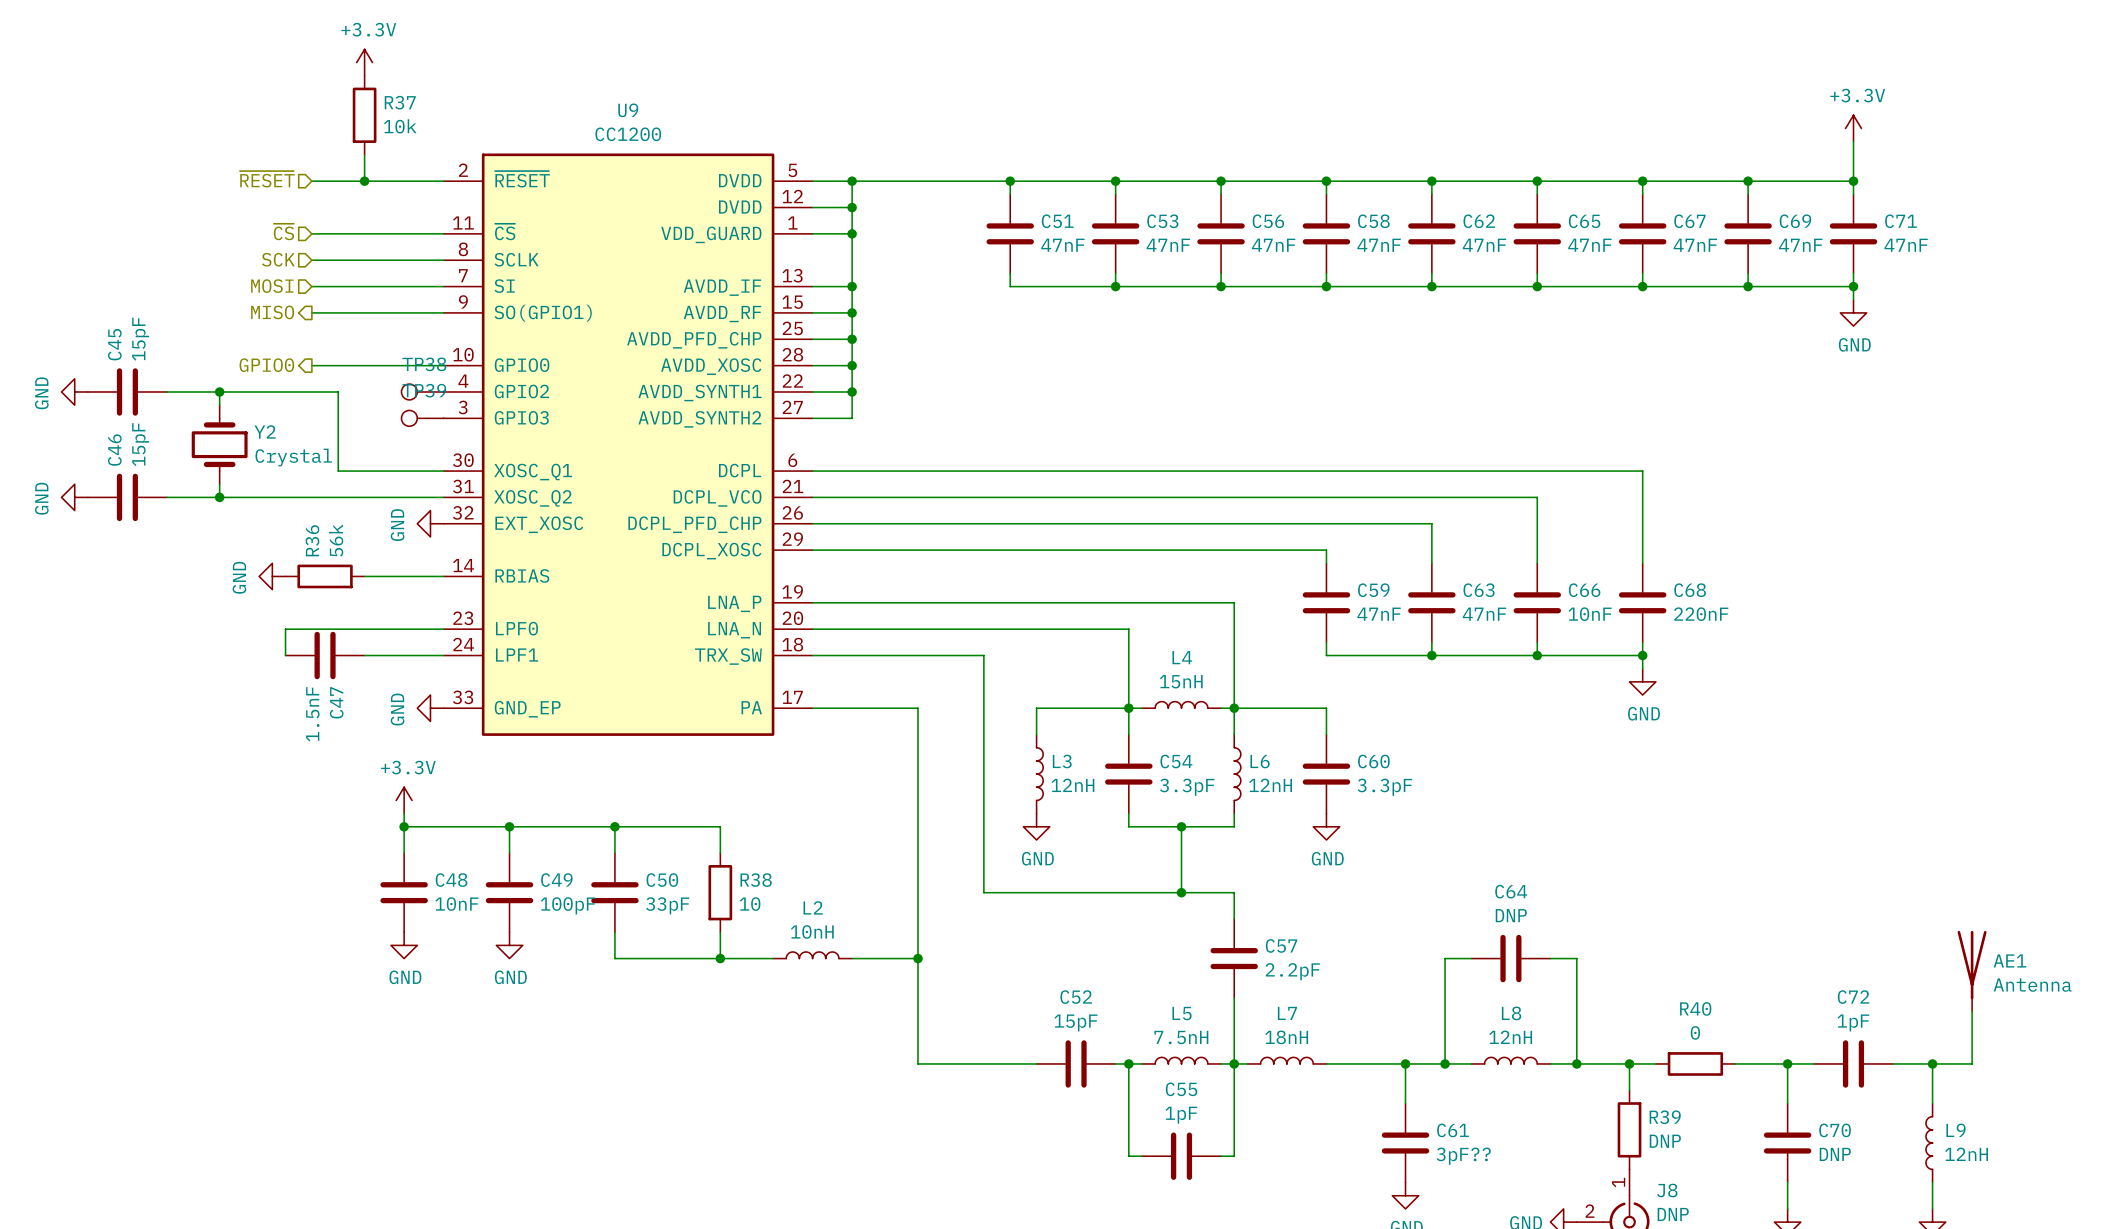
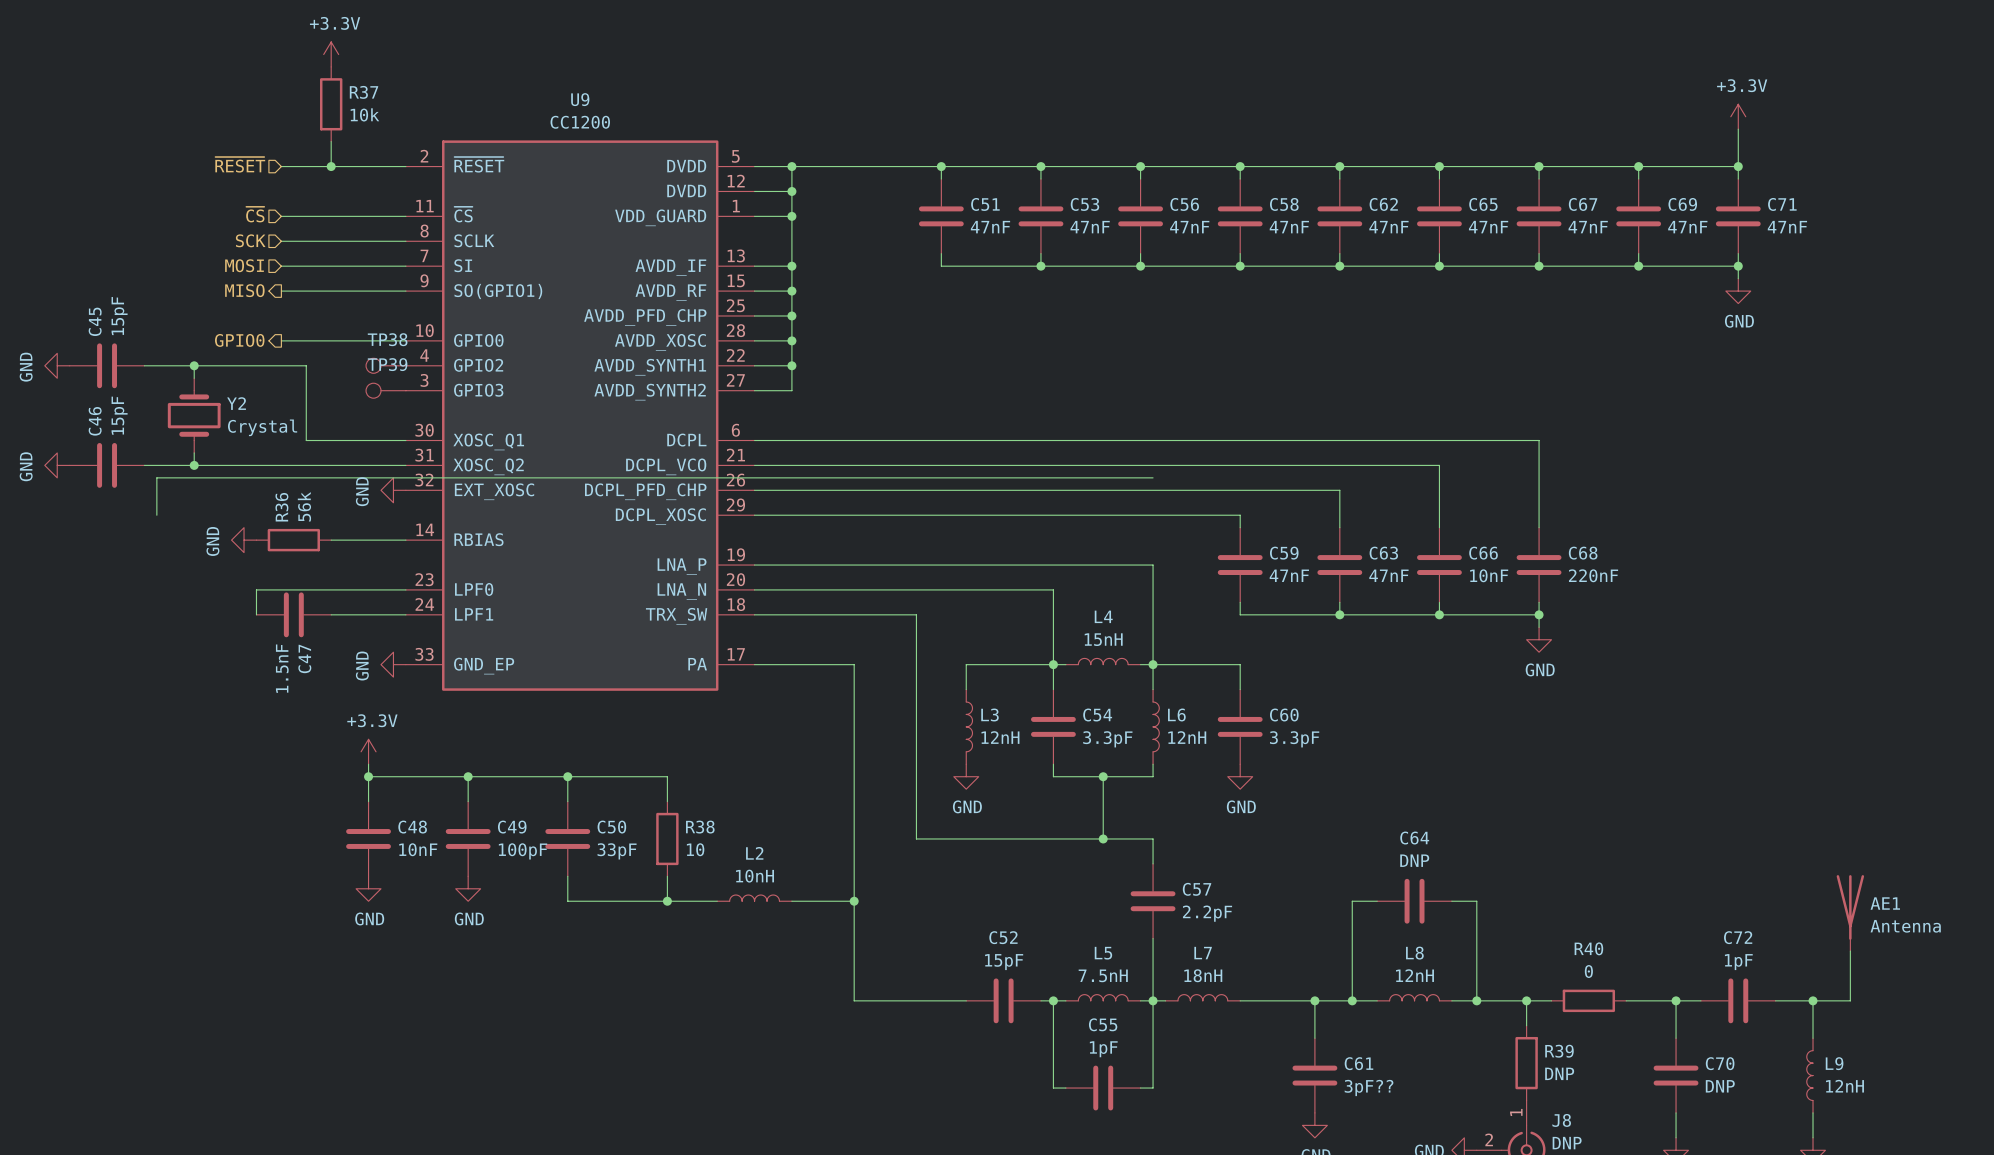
wire: none -> (1153, 477) (156, 477) (156, 515)

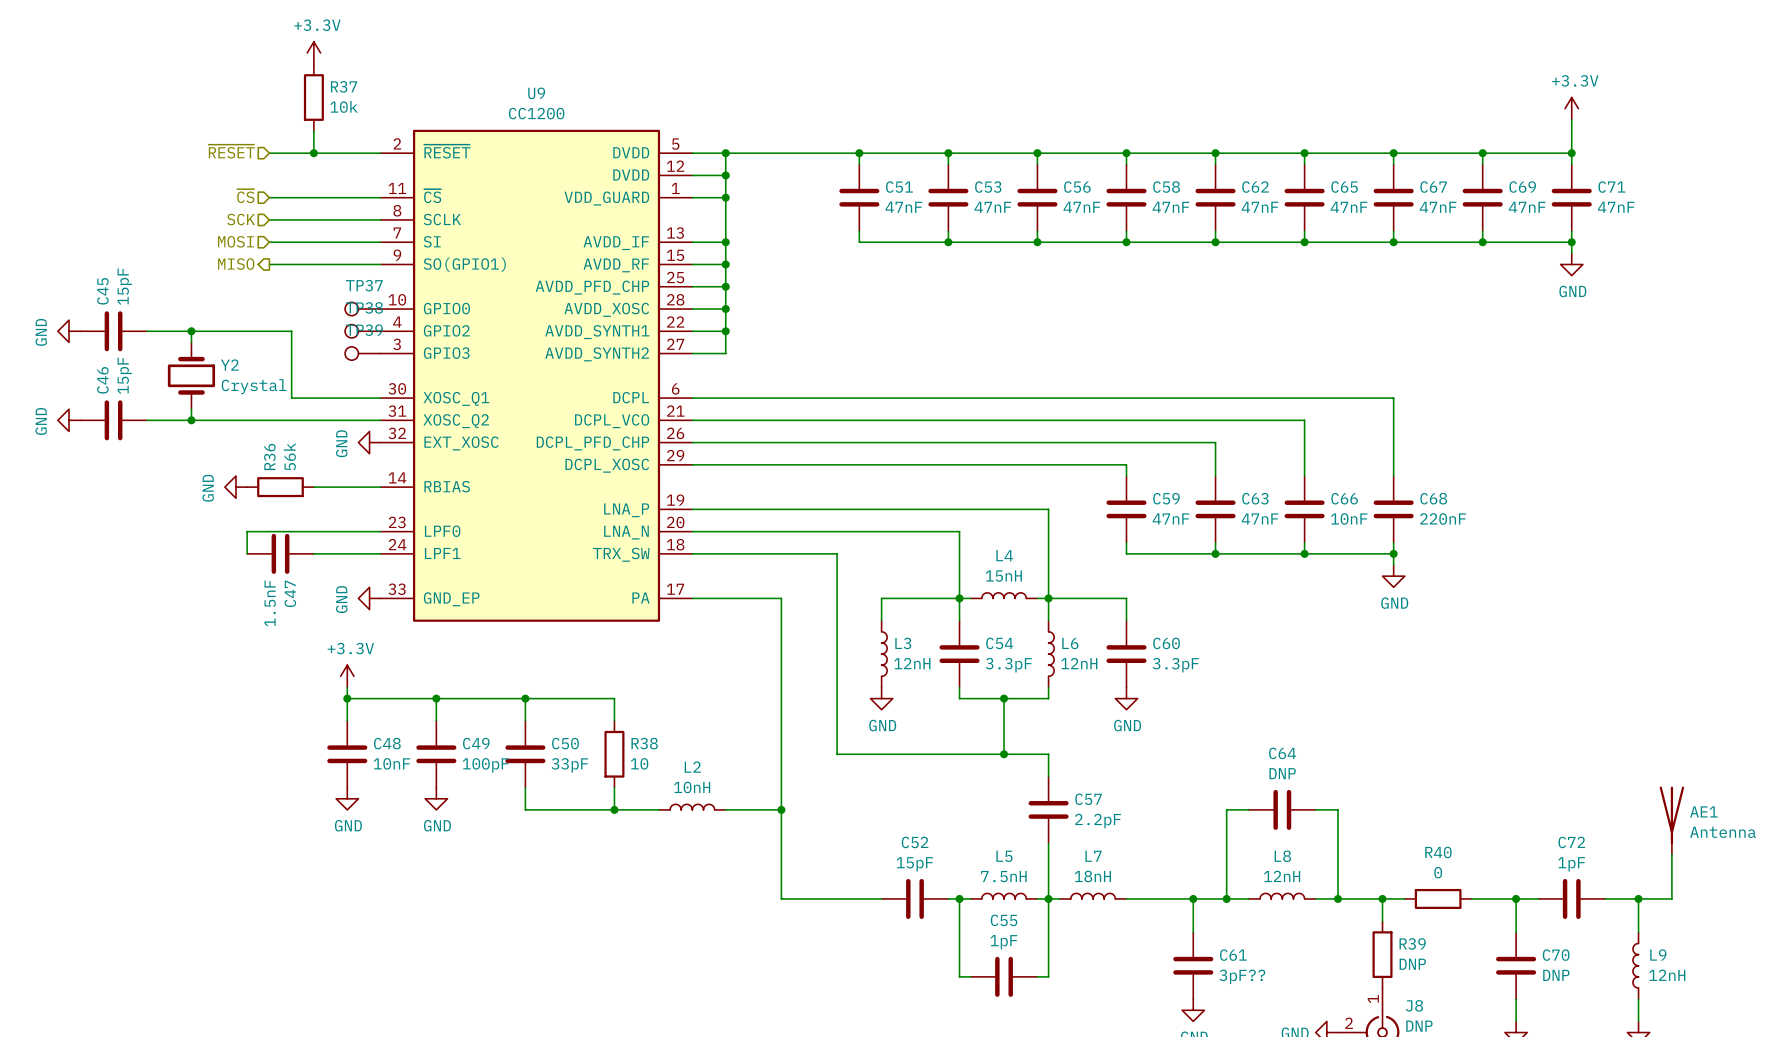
hierarchical label: GPIO0 (239, 340) -> none
wire: (281, 340) (405, 340) -> none
TP37: none -> (362, 309)
wire: (1153, 477) (156, 477) (156, 515) -> none

